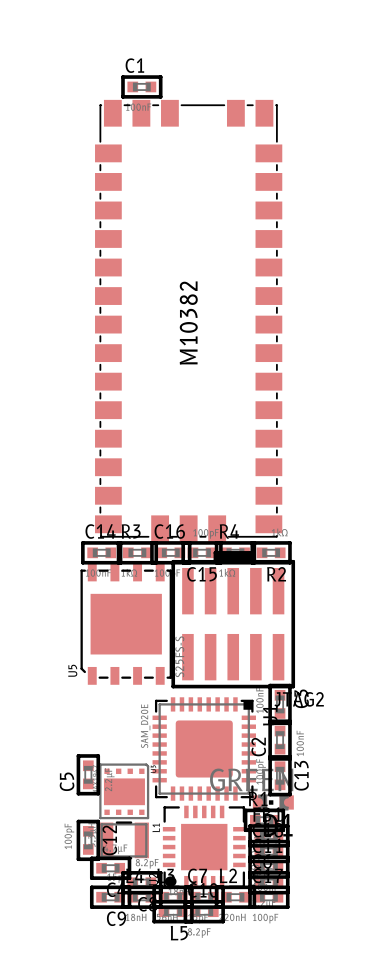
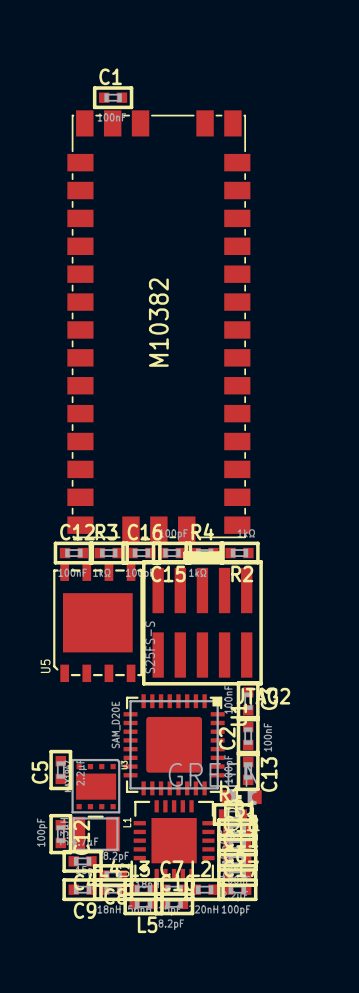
C14 name: C14 (100, 531) -> C12 (77, 532)

